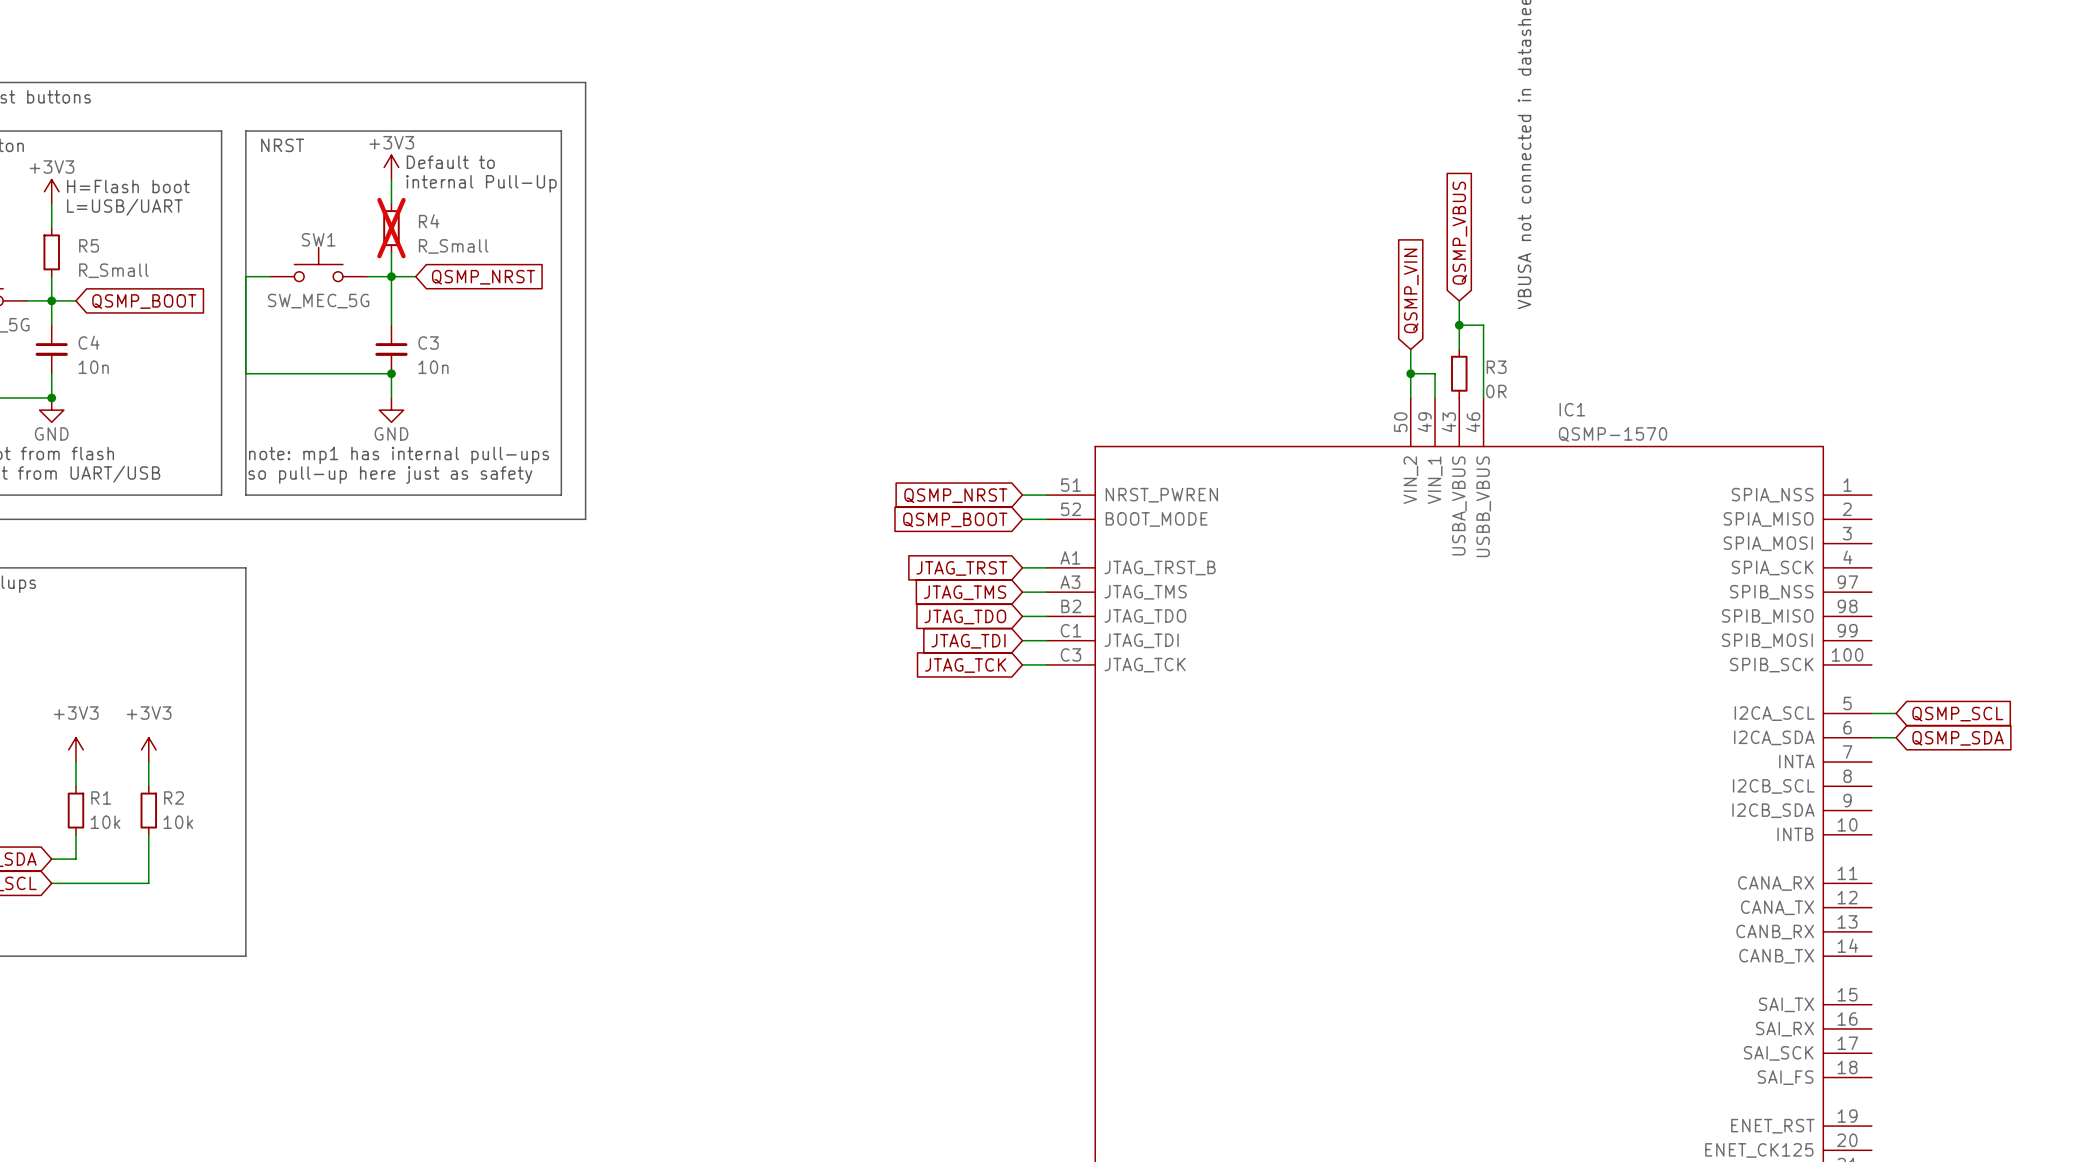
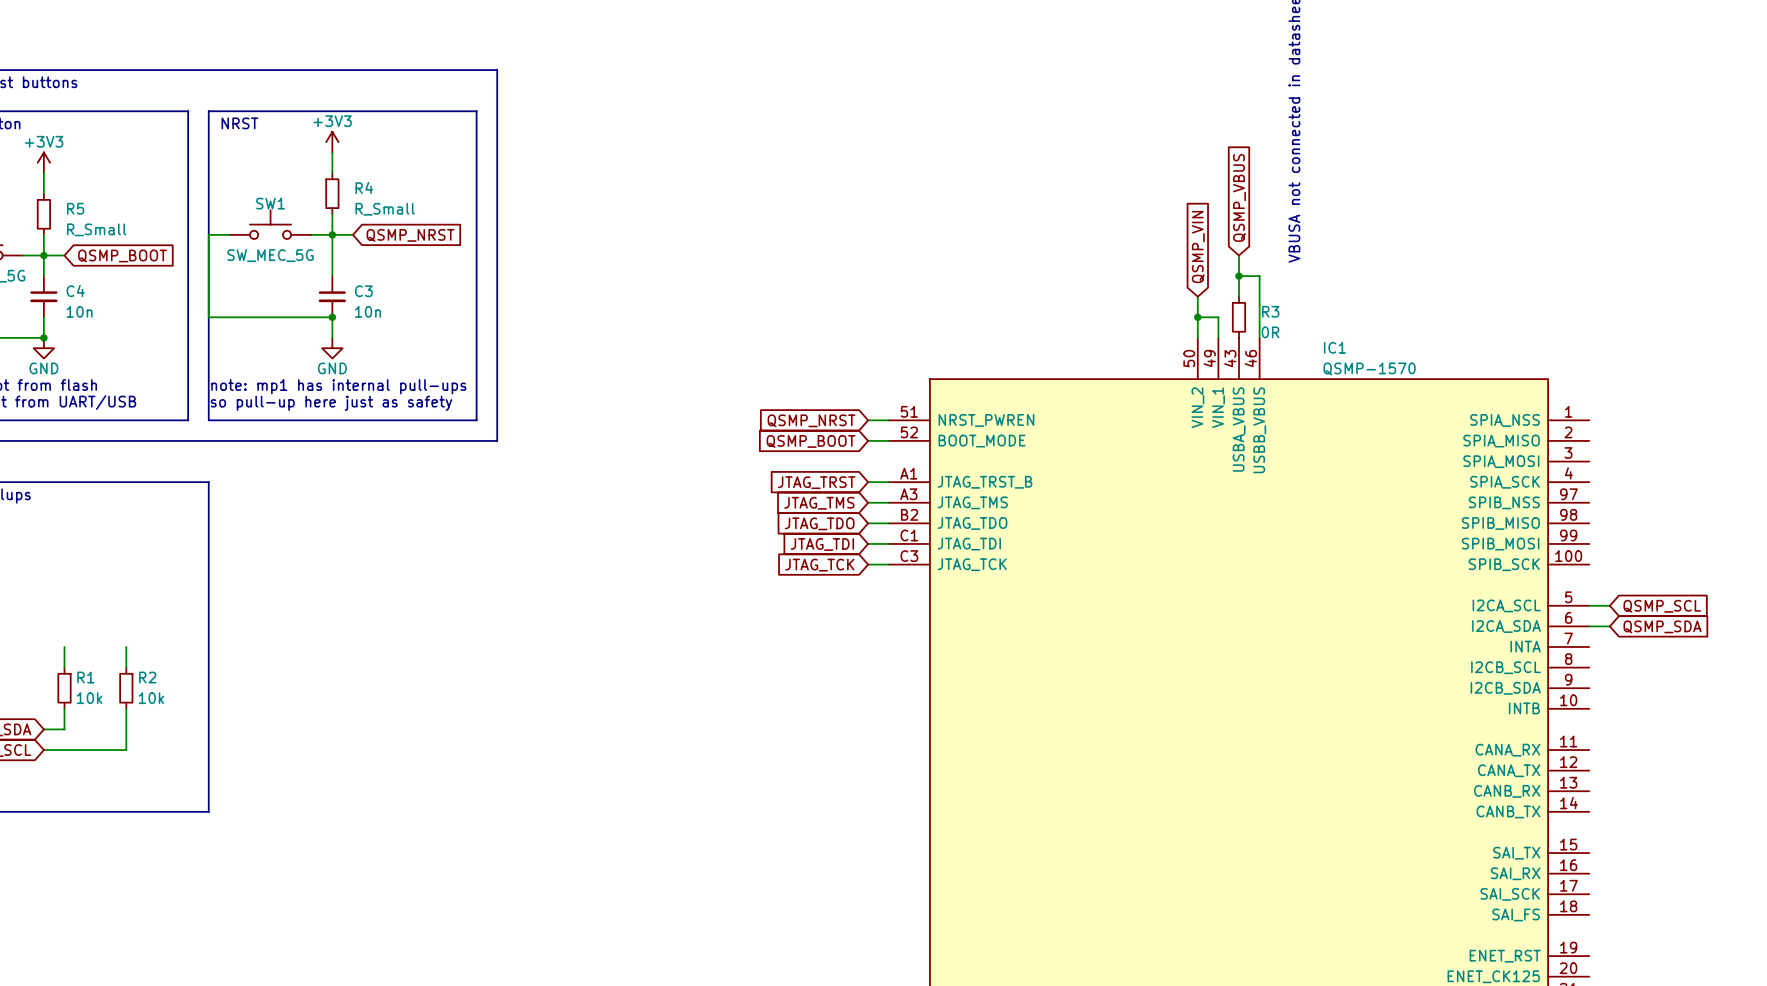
text: Default to (450, 162) -> none
text: internal Pull-Up (481, 183) -> none
text: H=Flash boot (128, 186) -> none
text: L=USB/UART (124, 207) -> none
R4 do-not-place cross: (391, 228) -> none
power symbol: +3V3 (75, 749) -> none
power symbol: +3V3 (148, 749) -> none

